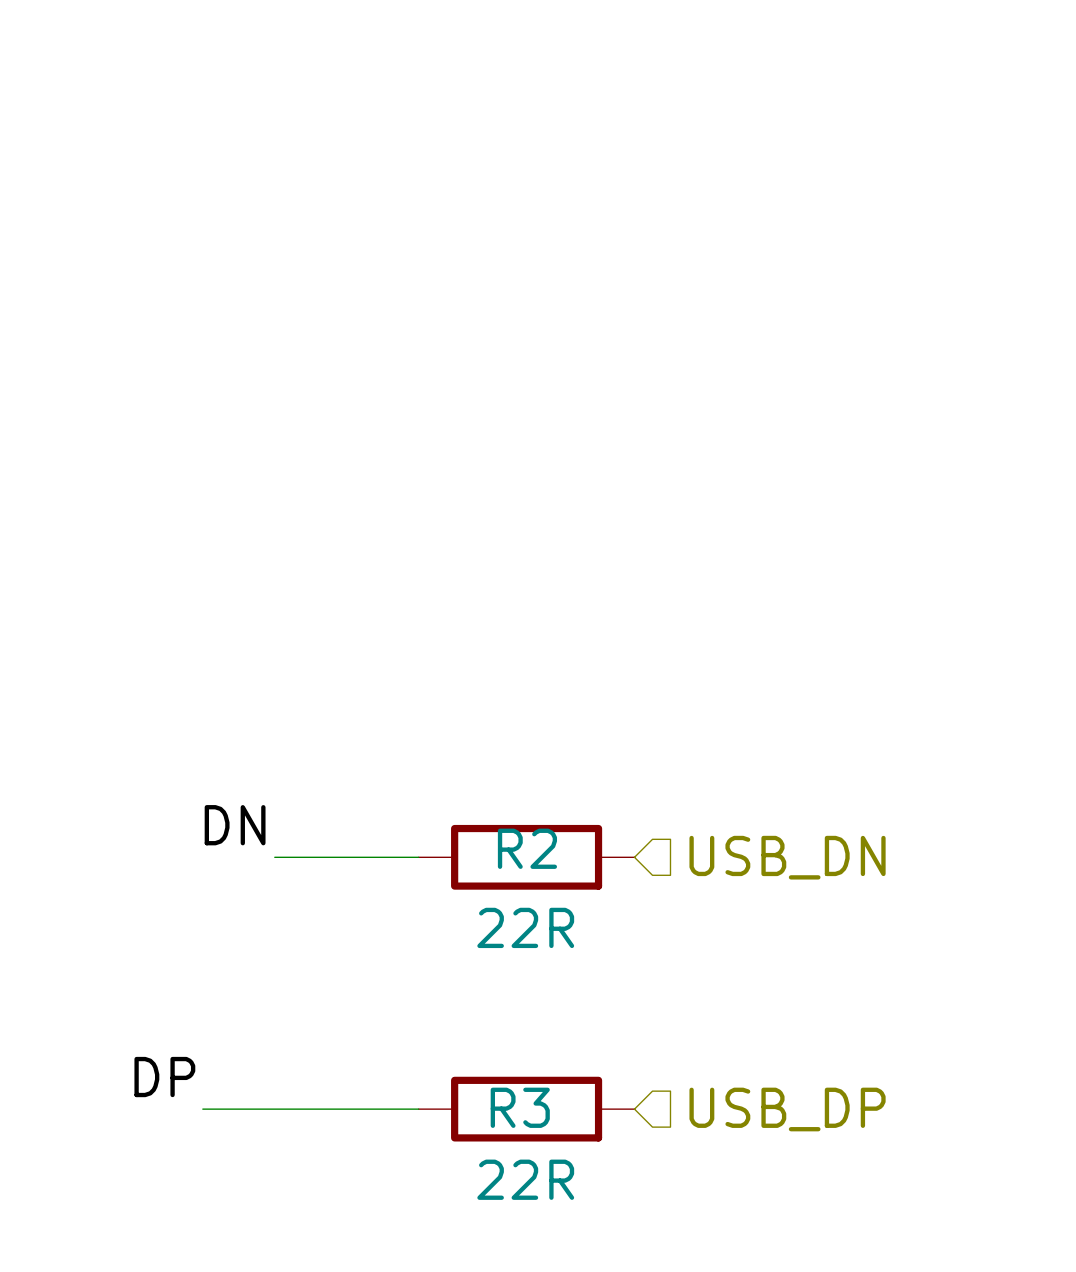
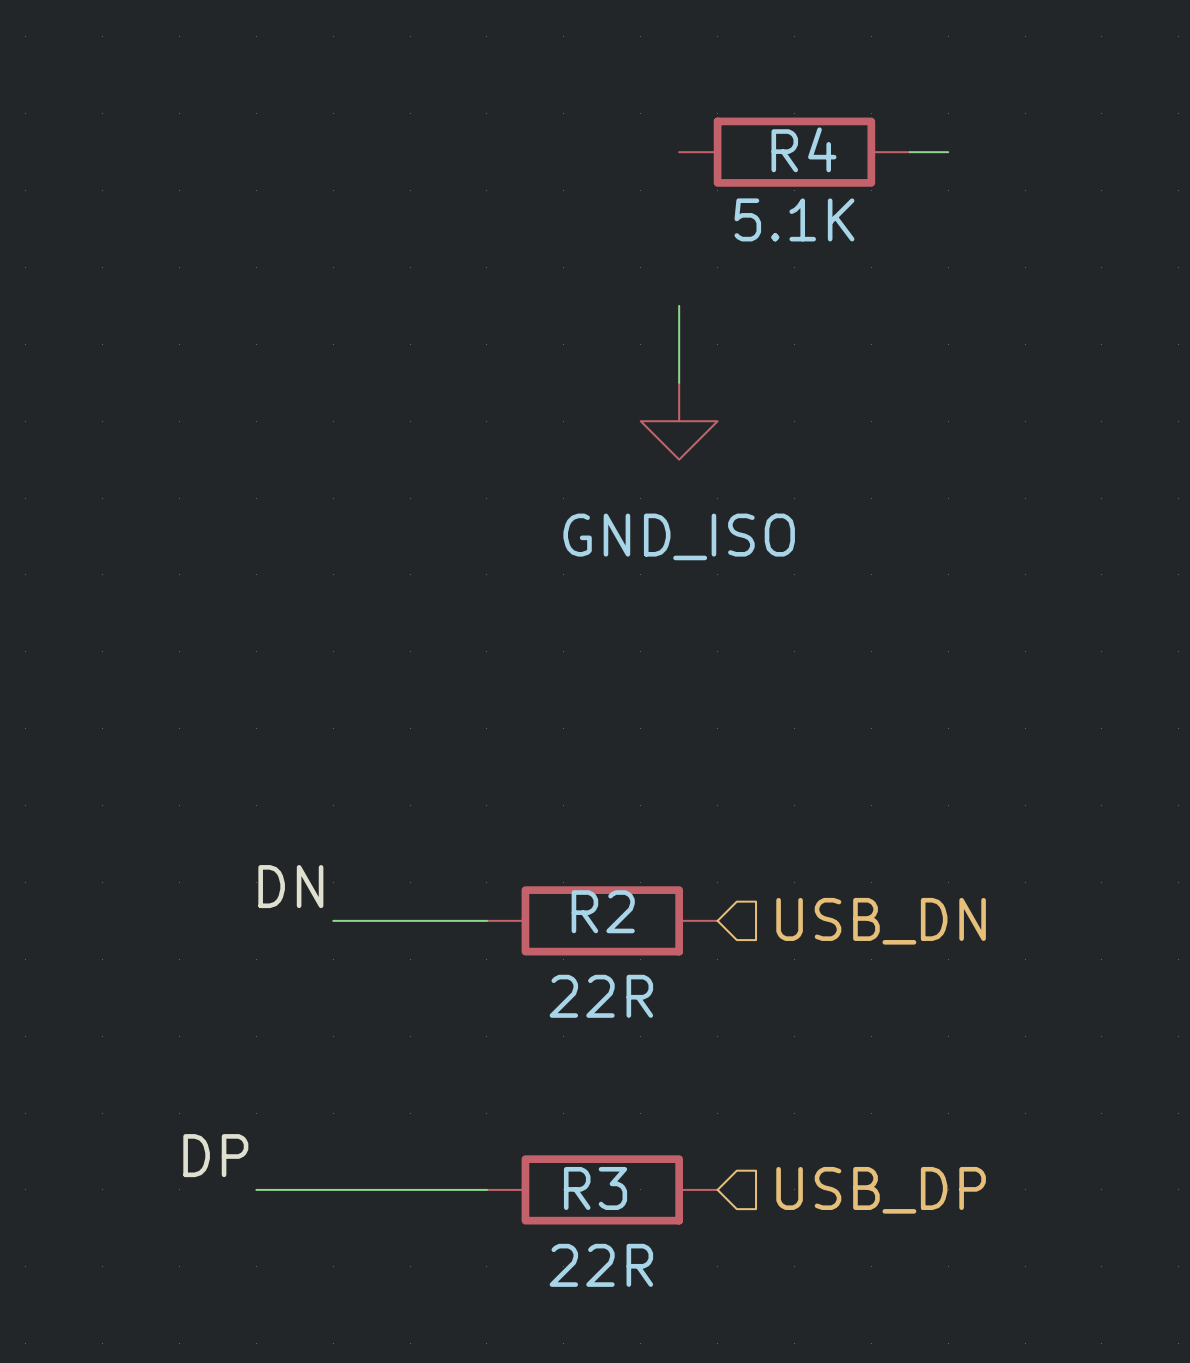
R4: none -> 5.1K (794, 152)
wire: none -> (909, 152) (948, 152)
wire: none -> (679, 305) (679, 382)
power symbol: none -> GND_ISO (679, 421)

